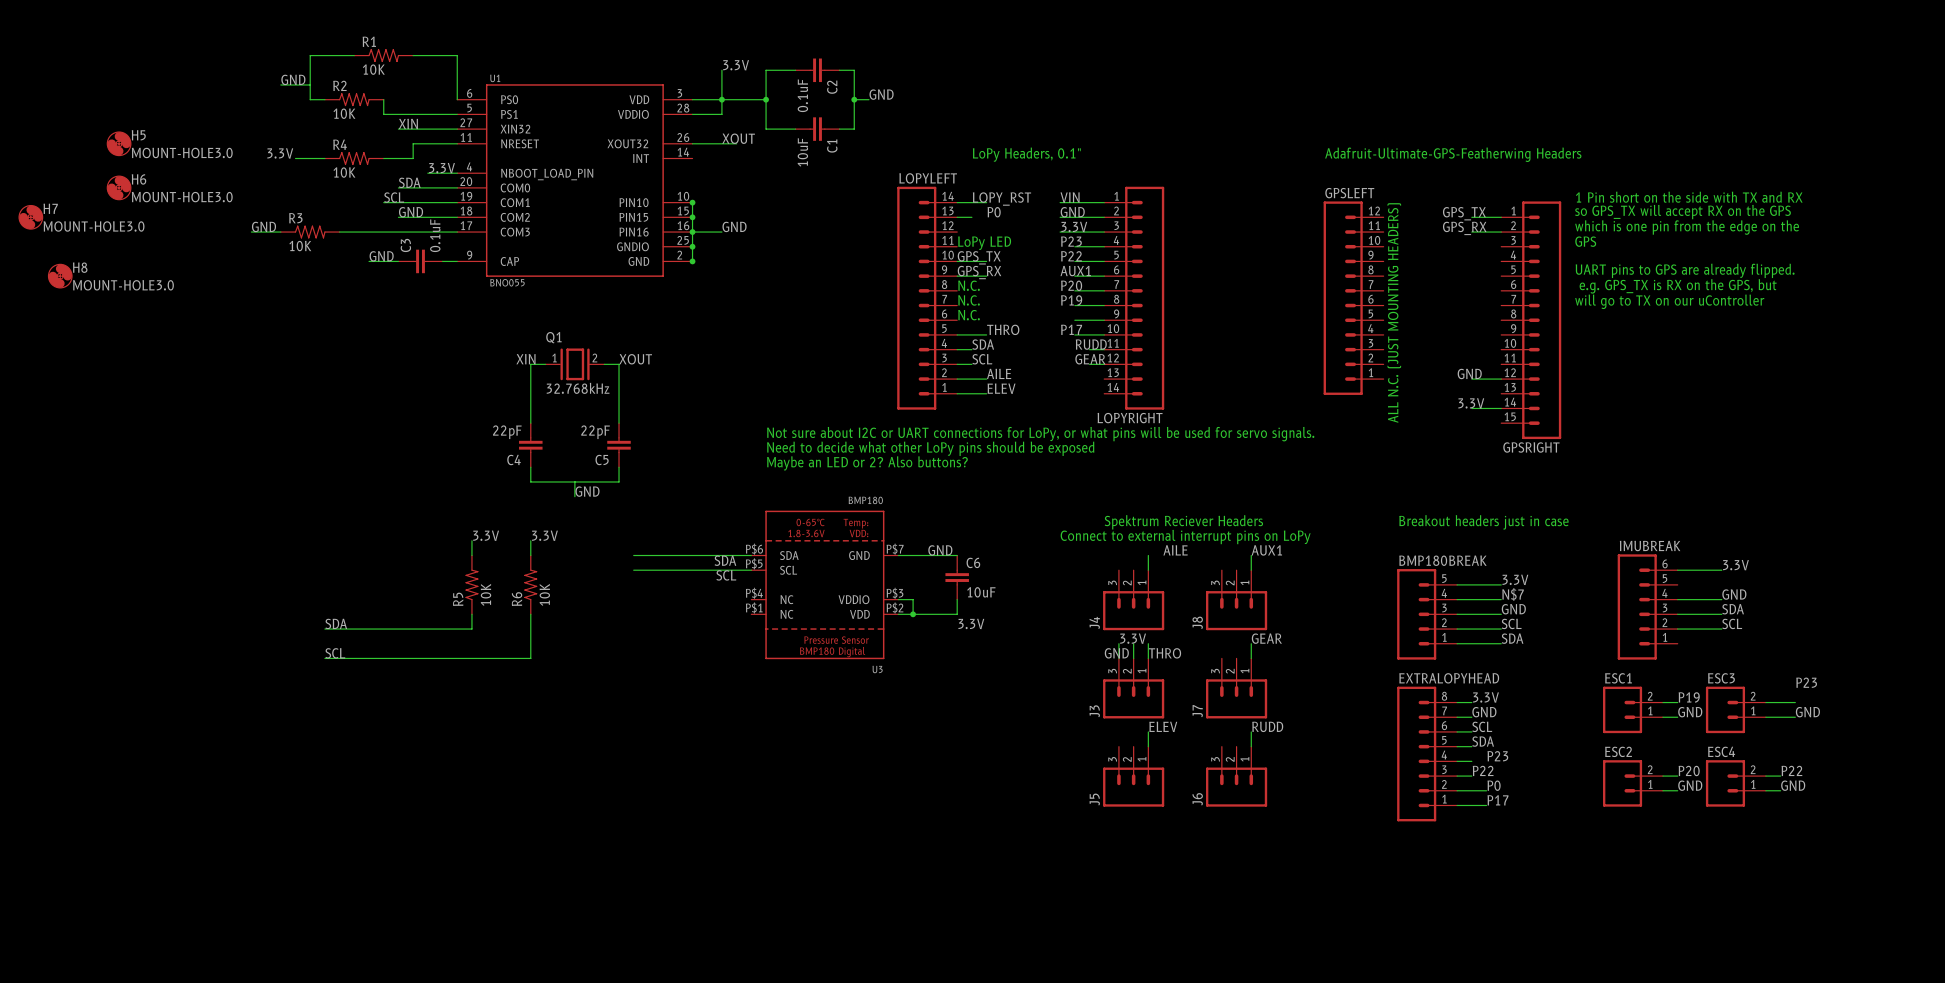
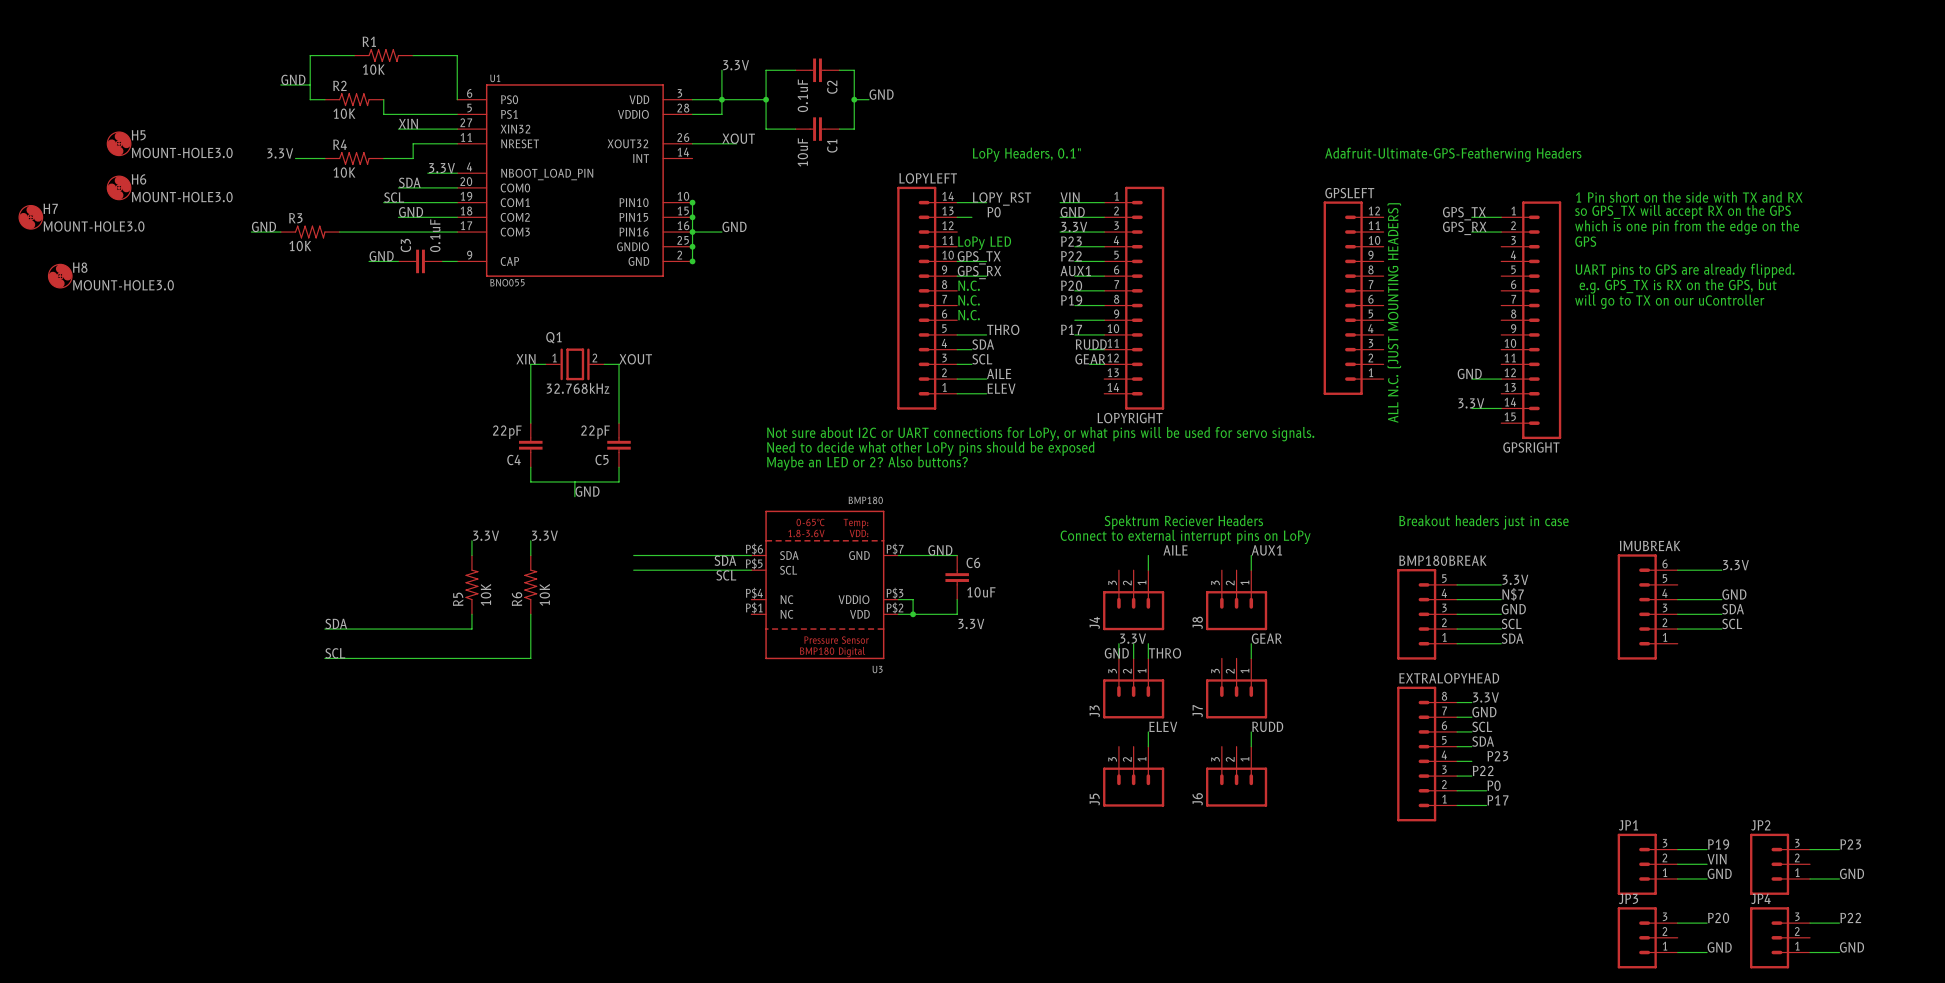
label: P23 (1806, 682) -> none
label: P19 (1689, 697) -> none
wire: (1662, 702) (1677, 702) -> none
wire: (1765, 702) (1795, 702) -> none
ESC1: (1632, 709) -> none
ESC3: (1735, 709) -> none
label: GND (1690, 712) -> none
label: GND (1807, 712) -> none
wire: (1662, 717) (1677, 717) -> none
wire: (1765, 717) (1795, 717) -> (1810, 849) (1839, 849)
label: P20 (1689, 770) -> none
label: P22 (1791, 770) -> none
wire: (1662, 776) (1677, 776) -> none
wire: (1765, 776) (1780, 776) -> none
ESC2: (1632, 783) -> none
ESC4: (1735, 783) -> none
label: GND (1690, 785) -> none
label: GND (1793, 785) -> none
wire: (1662, 790) (1677, 790) -> none
wire: (1765, 790) (1780, 790) -> none
label: none -> P19 (1718, 844)
label: none -> P23 (1850, 844)
wire: none -> (1677, 849) (1707, 849)
label: none -> VIN (1717, 859)
JP1: none -> (1647, 864)
wire: none -> (1677, 864) (1707, 864)
JP2: none -> (1780, 864)
label: none -> GND (1719, 873)
label: none -> GND (1852, 873)
wire: none -> (1677, 878) (1707, 878)
wire: none -> (1810, 878) (1839, 878)
label: none -> P22 (1850, 917)
label: none -> P20 (1718, 918)
wire: none -> (1677, 923) (1707, 923)
wire: none -> (1810, 923) (1839, 923)
JP3: none -> (1647, 937)
JP4: none -> (1780, 937)
label: none -> GND (1719, 947)
label: none -> GND (1852, 947)
wire: none -> (1677, 952) (1707, 952)
wire: none -> (1810, 952) (1839, 952)

